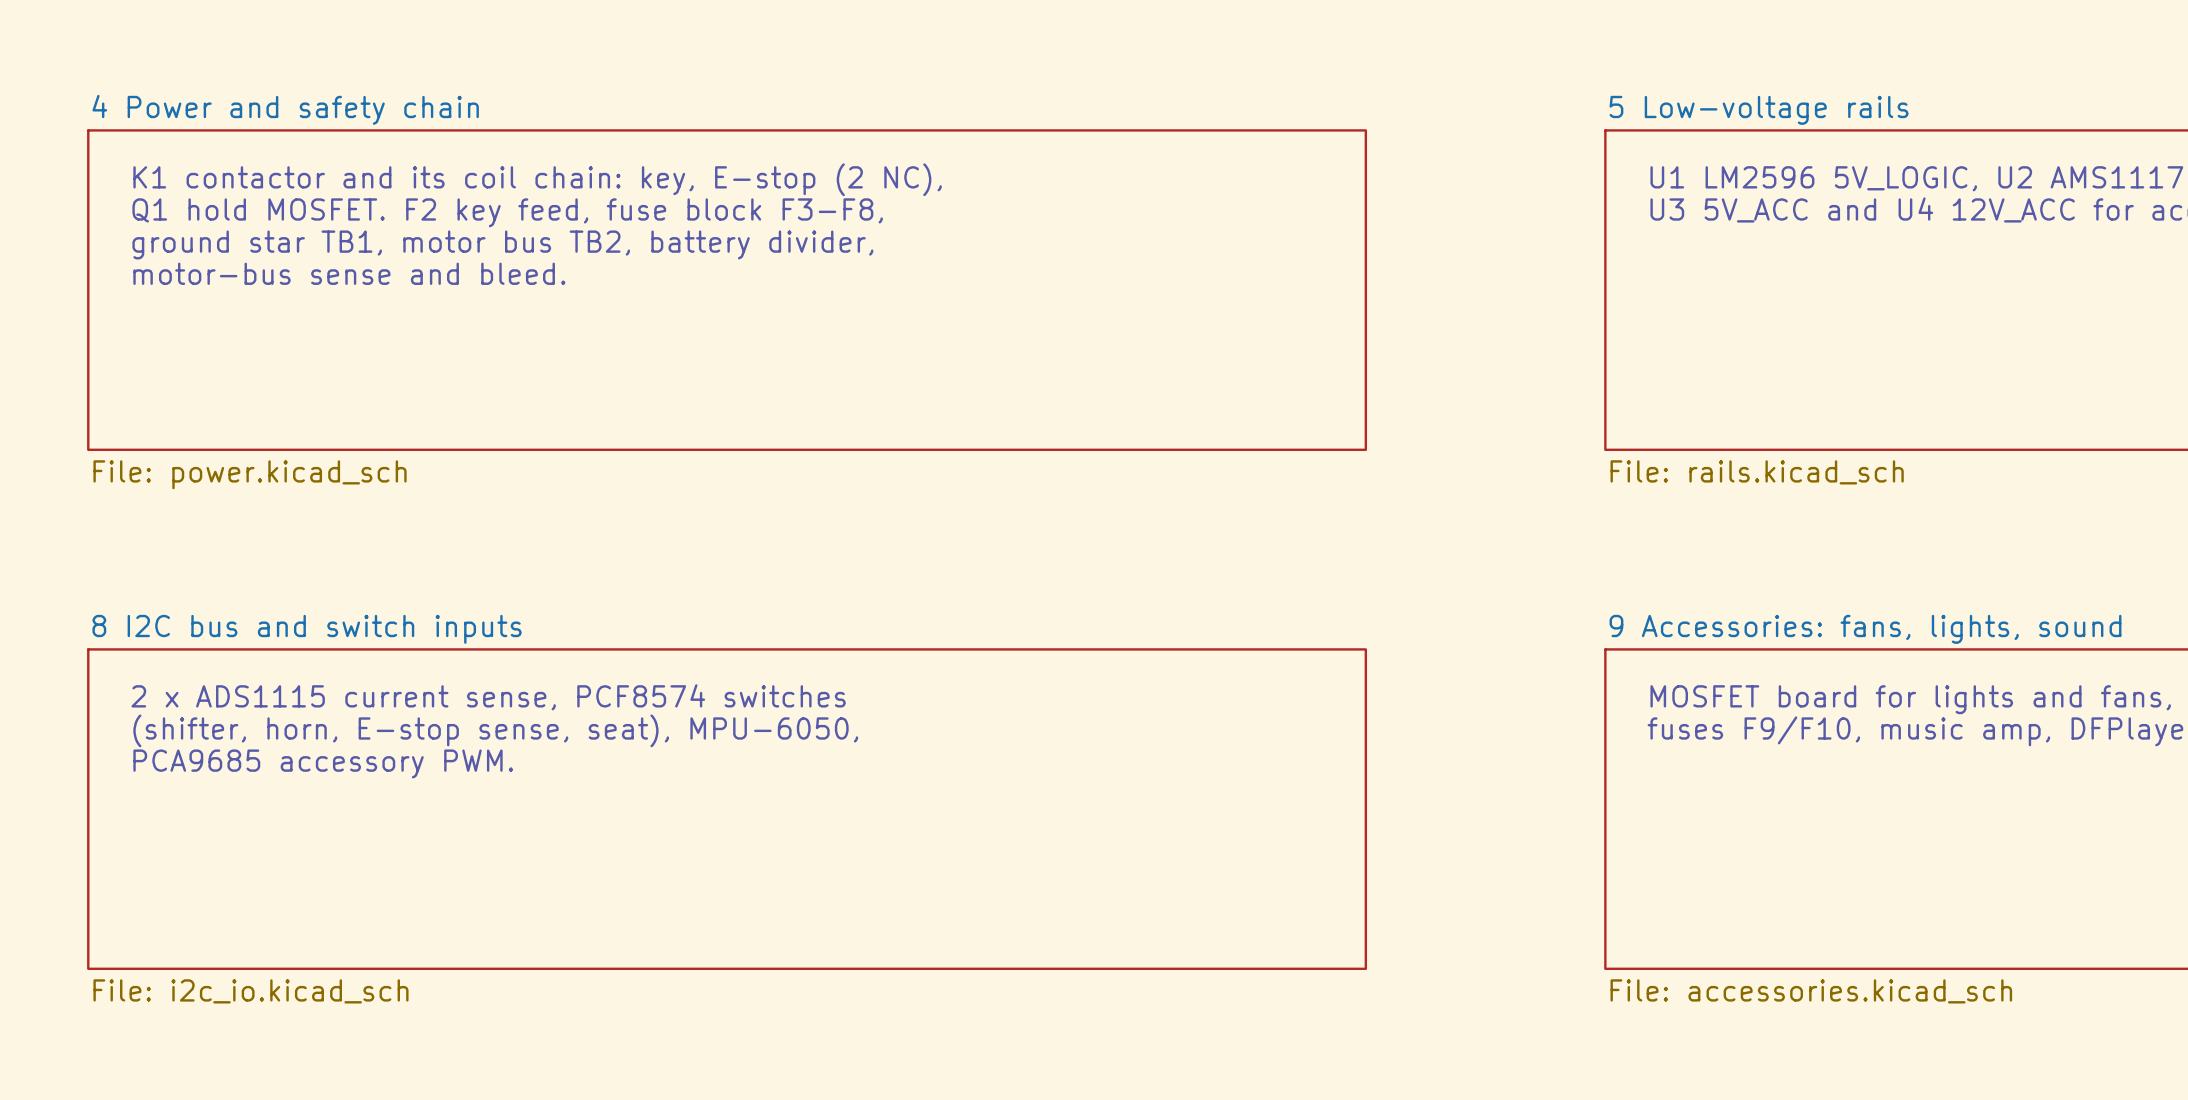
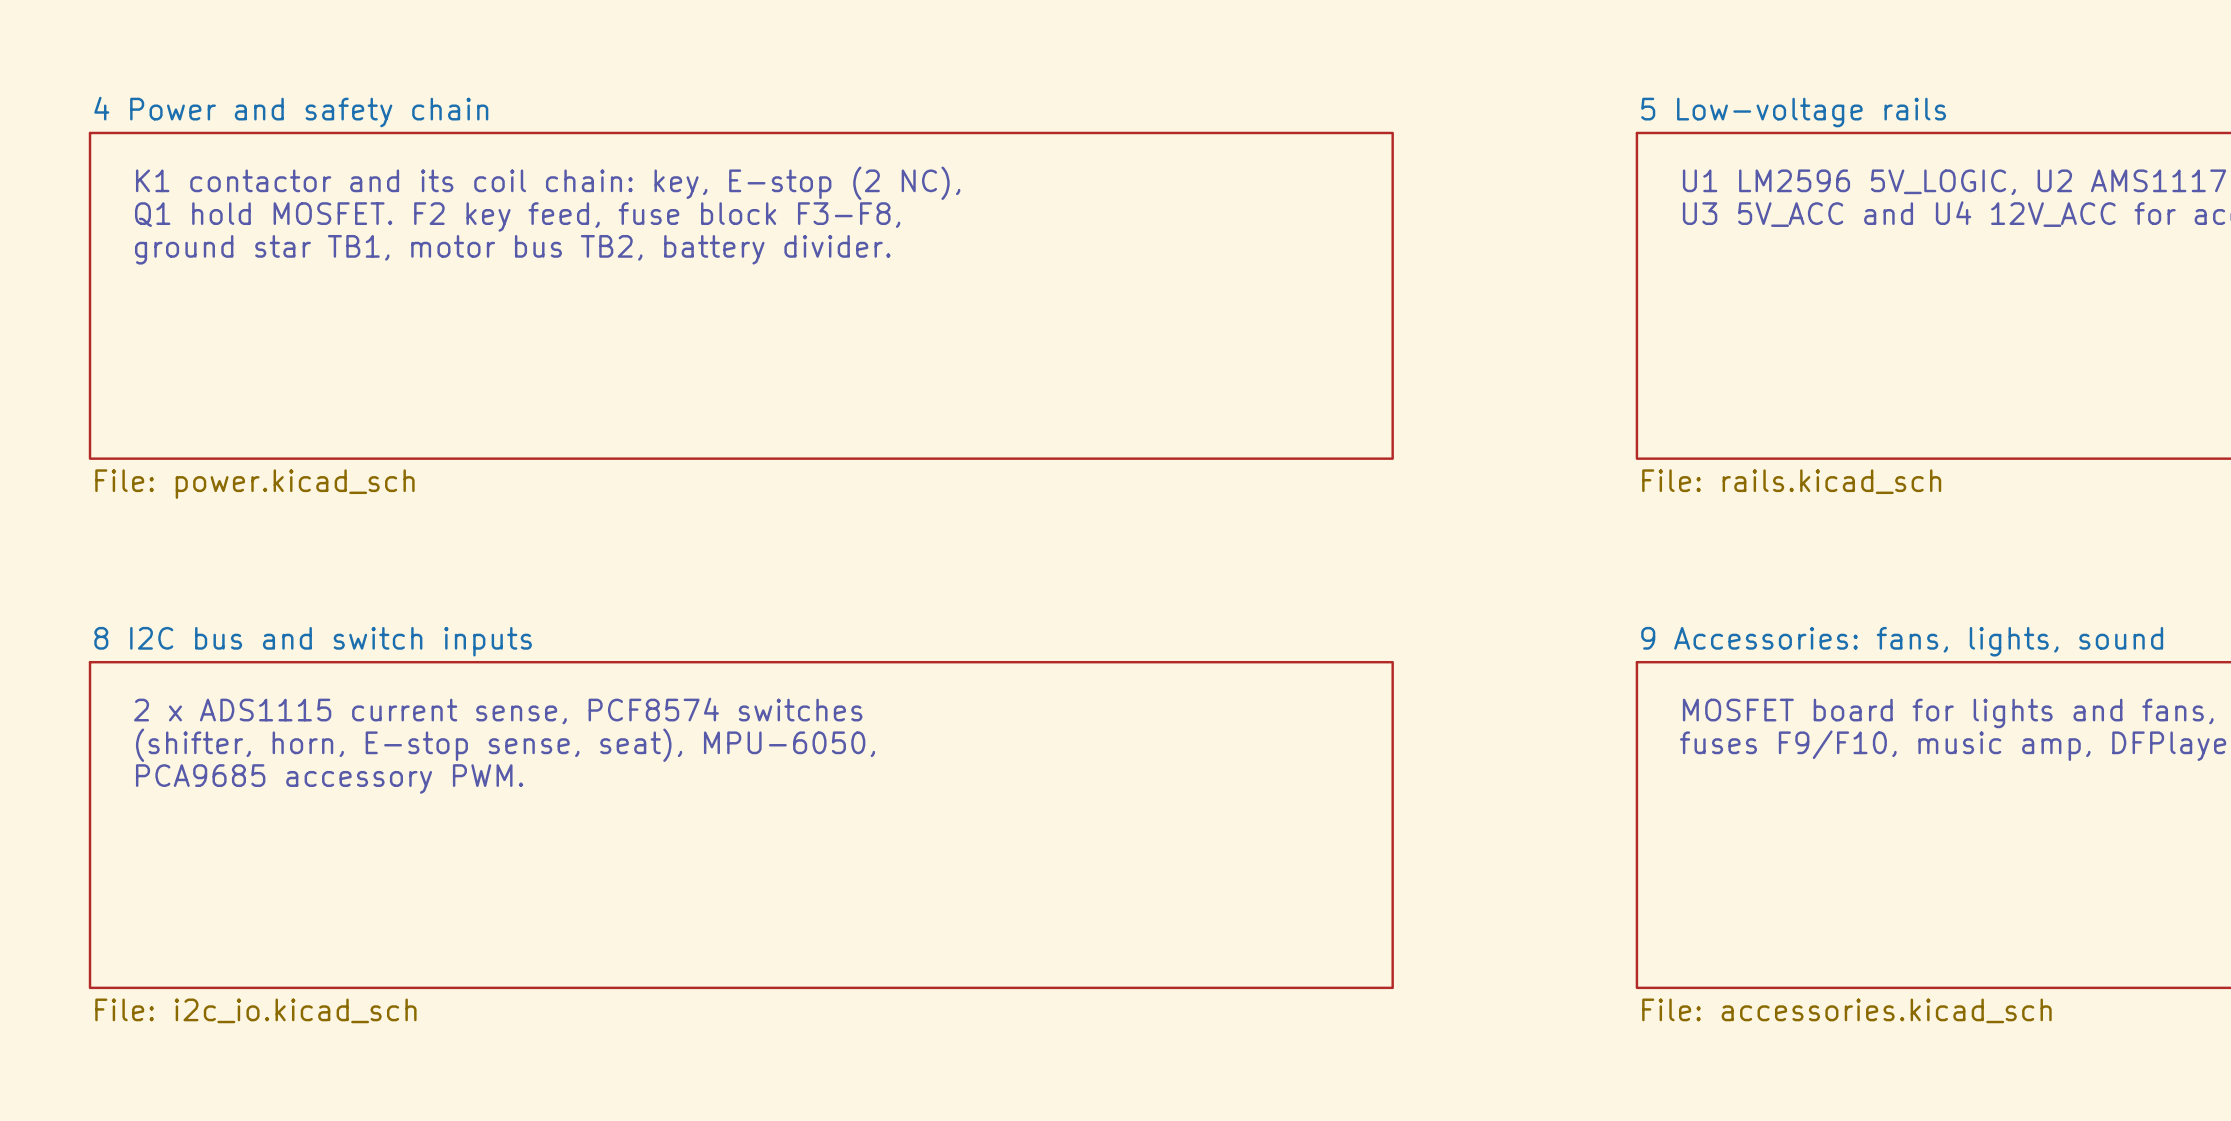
text: ground star TB1, motor bus TB2, battery divider, (502, 244) -> ground star TB1, motor bus TB2, battery divider. (512, 249)
text: motor-bus sense and bleed. (349, 273) -> none

